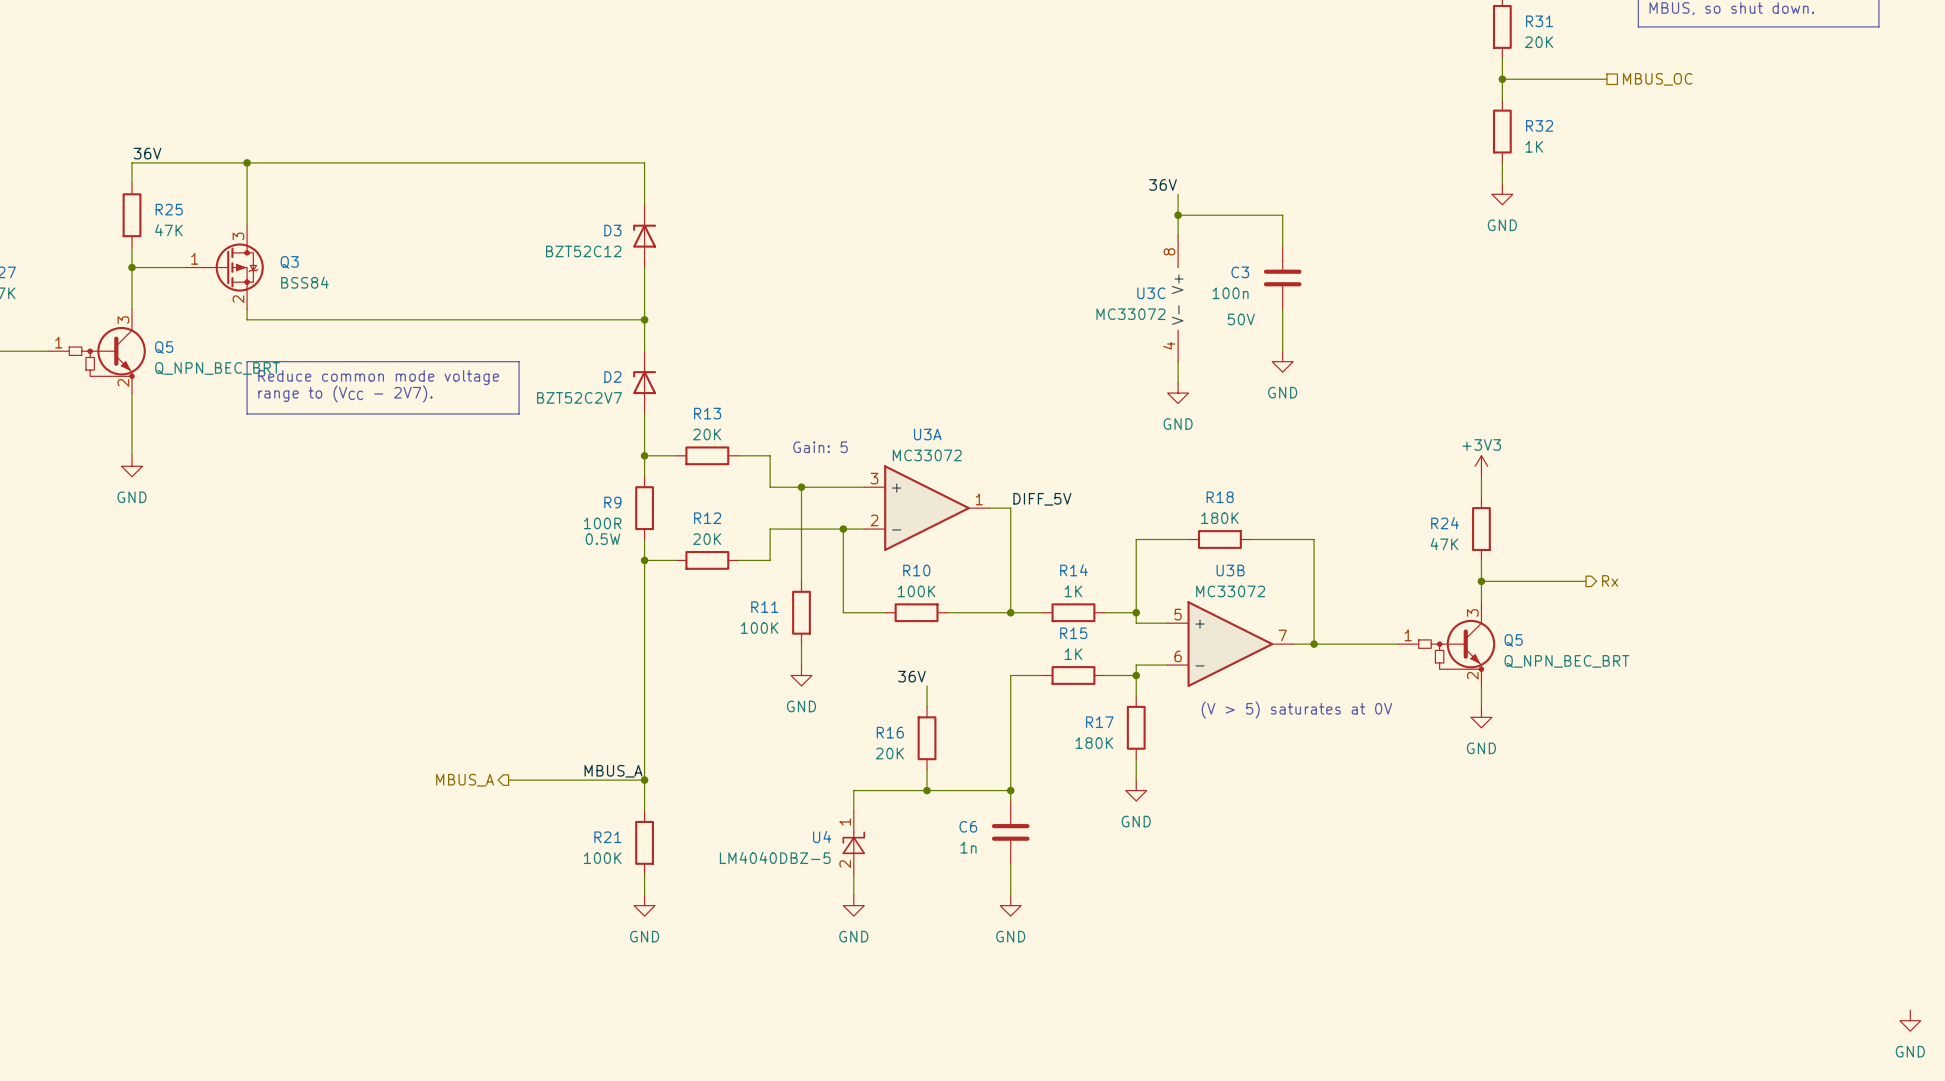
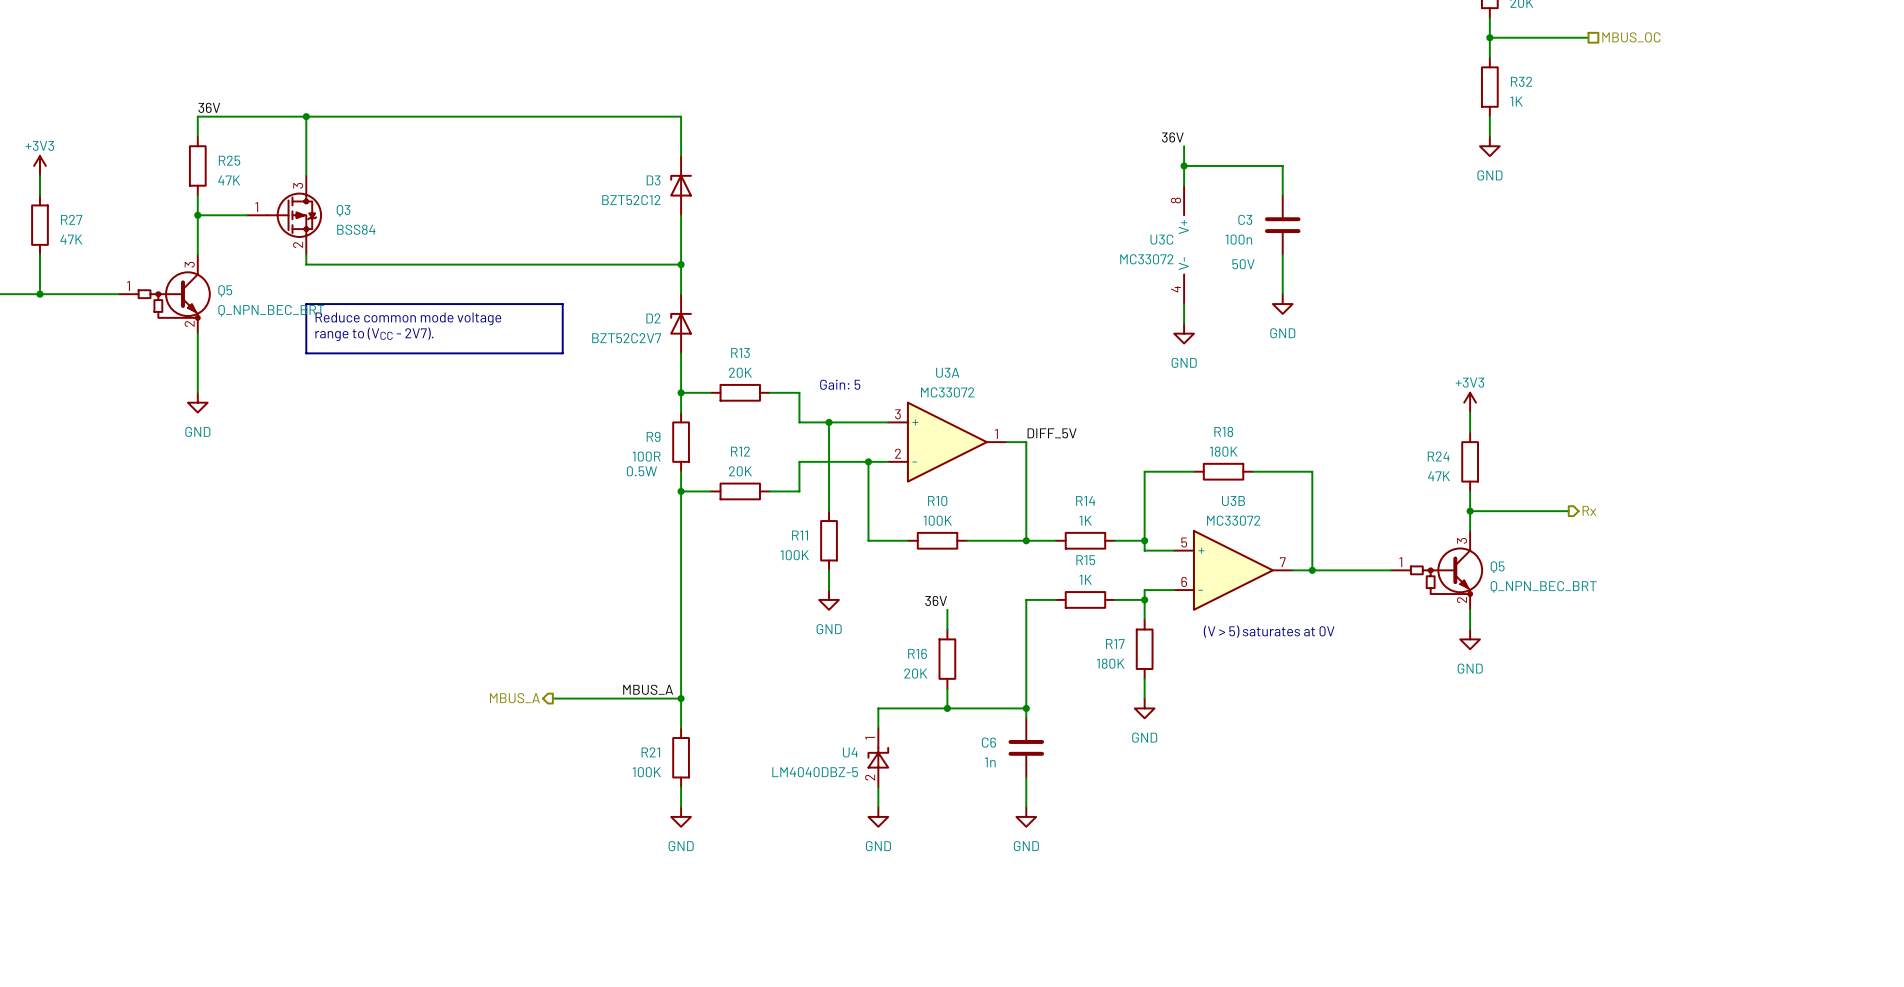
power symbol: GND (1910, 1020) -> none

